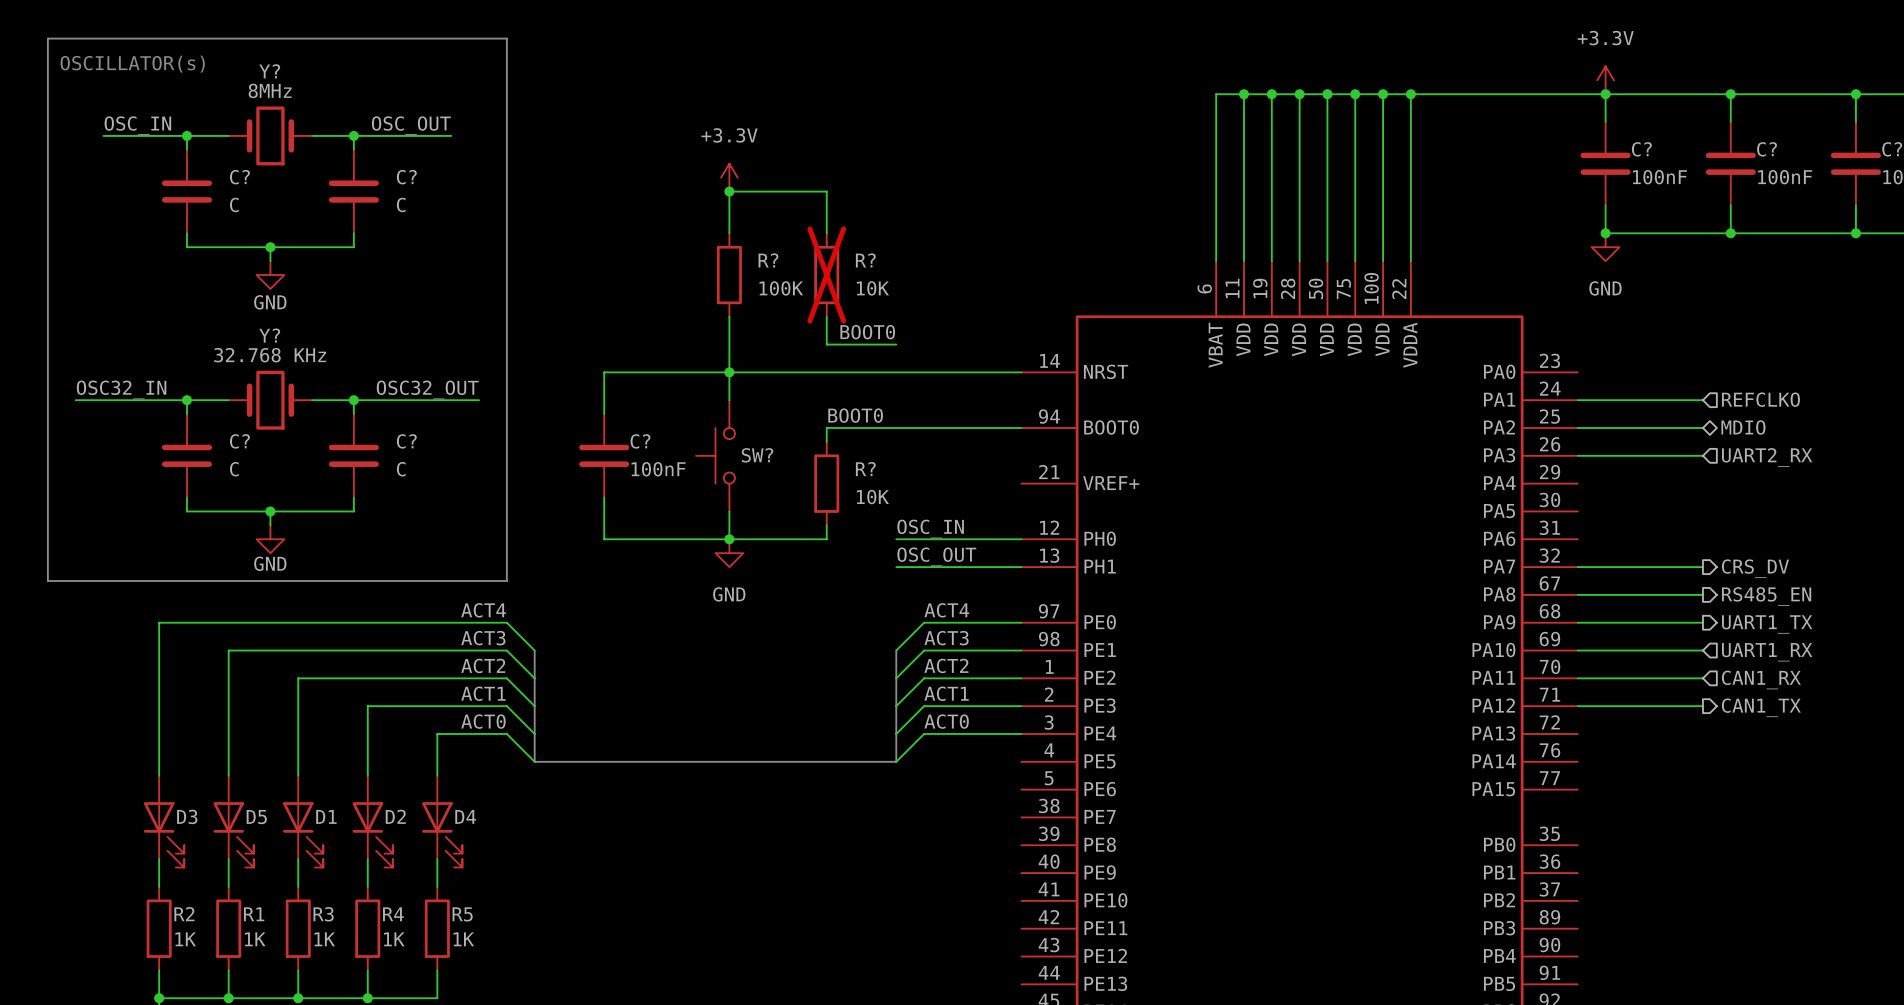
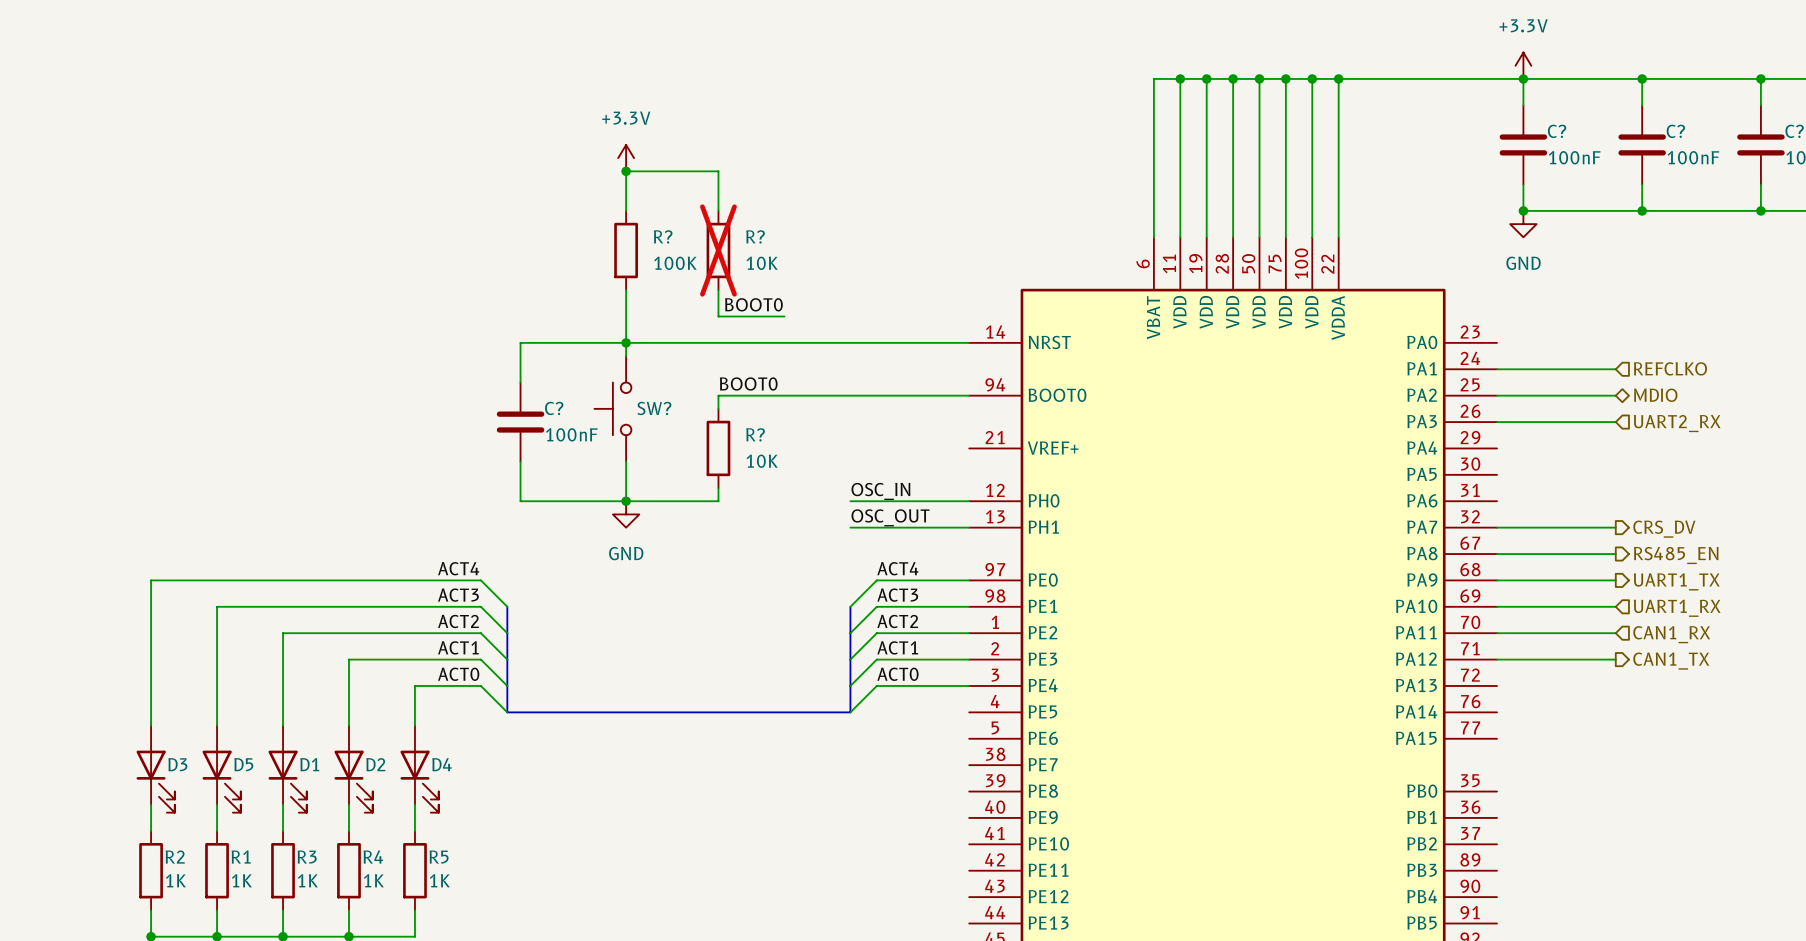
line: (47, 38) (506, 38) (506, 581) (47, 581) (47, 38) -> none
text: OSCILLATOR(s) (132, 64) -> none
label: OSC_IN (137, 125) -> none
label: OSC_OUT (411, 125) -> none
wire: (103, 135) (228, 135) -> none
wire: (186, 135) (186, 149) -> none
junction: (186, 135) -> none
Y?: 8MHz (270, 135) -> none
wire: (312, 135) (451, 135) -> none
wire: (353, 135) (353, 149) -> none
junction: (353, 135) -> none
power symbol position: +3.3V (729, 177) -> +3.3V (626, 158)
C?: C (186, 191) -> none
C?: C (353, 191) -> none
junction: none -> (626, 171)
wire: (729, 191) (729, 233) -> (692, 171) (626, 171) (626, 210)
junction: (729, 191) -> none
wire: (757, 191) (826, 191) (826, 233) -> (718, 171) (718, 210)
wire: (186, 233) (186, 247) (353, 247) (353, 233) -> none
wire: (270, 247) (270, 261) -> none
junction: (270, 247) -> none
power symbol: GND (270, 275) -> none
R? position: (729, 275) -> (626, 250)
R? position: (826, 275) -> (718, 250)
wire: none -> (626, 290) (626, 356)
wire: (729, 316) (729, 400) -> none
wire: (826, 316) (826, 344) (896, 344) -> (718, 290) (718, 316) (784, 316)
label position: BOOT0 (867, 332) -> BOOT0 (753, 304)
wire: (604, 372) (604, 414) -> (573, 342) (520, 342) (520, 382)
junction: none -> (626, 342)
junction: (729, 372) -> none
label: OSC32_IN (121, 389) -> none
label: OSC32_OUT (427, 389) -> none
wire: (75, 400) (228, 400) -> none
wire: (186, 400) (186, 414) -> none
junction: (186, 400) -> none
Y?: 32.768 KHz (270, 400) -> none
wire: (312, 400) (479, 400) -> none
wire: (353, 400) (353, 414) -> none
junction: (353, 400) -> none
label position: BOOT0 (855, 415) -> BOOT0 (748, 383)
wire: (826, 428) (826, 441) -> (784, 395) (718, 395) (718, 408)
C?: C (186, 455) -> none
C?: C (353, 455) -> none
C? position: (604, 455) -> (520, 422)
SW? position: (715, 455) -> (612, 408)
R? position: (826, 483) -> (718, 448)
wire: (186, 497) (186, 511) (353, 511) (353, 497) -> none
wire: (604, 497) (604, 539) -> (520, 461) (520, 501) (573, 501)
wire: none -> (626, 461) (626, 501)
wire: (270, 511) (270, 525) -> none
junction: (270, 511) -> none
wire: (729, 511) (729, 539) -> none
wire: (826, 525) (826, 539) (757, 539) -> (718, 488) (718, 501)
power symbol: GND (270, 539) -> none
junction: none -> (626, 501)
junction: (729, 539) -> none
power symbol position: GND (729, 553) -> GND (626, 514)

